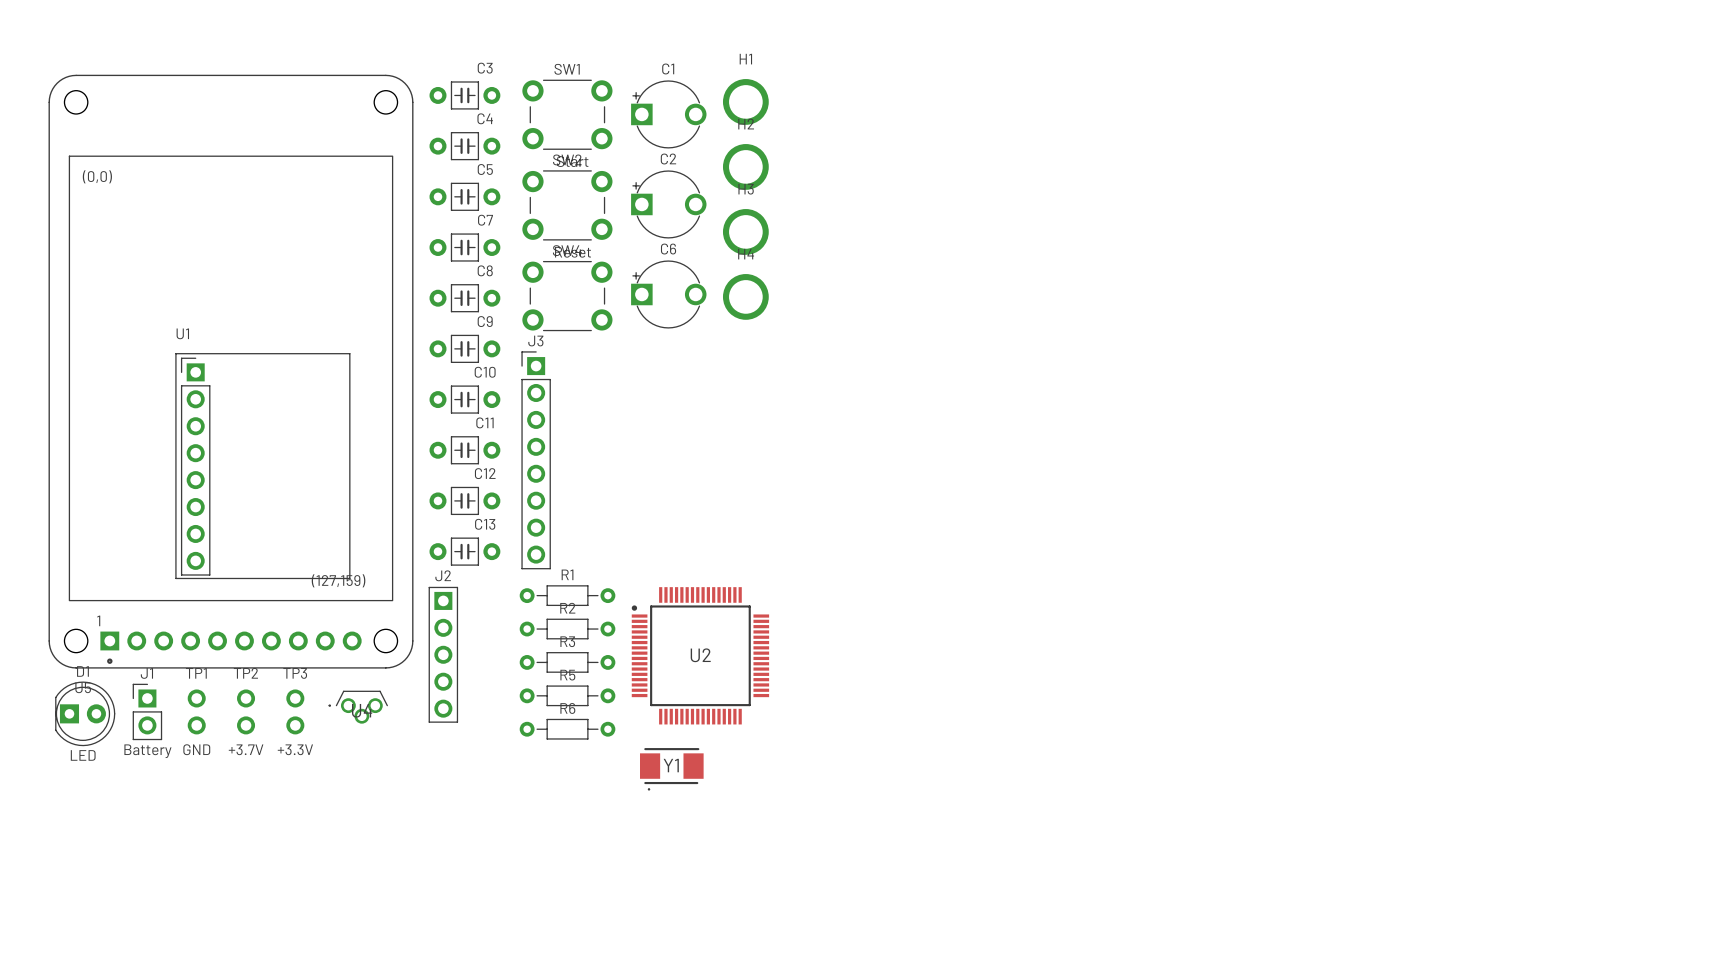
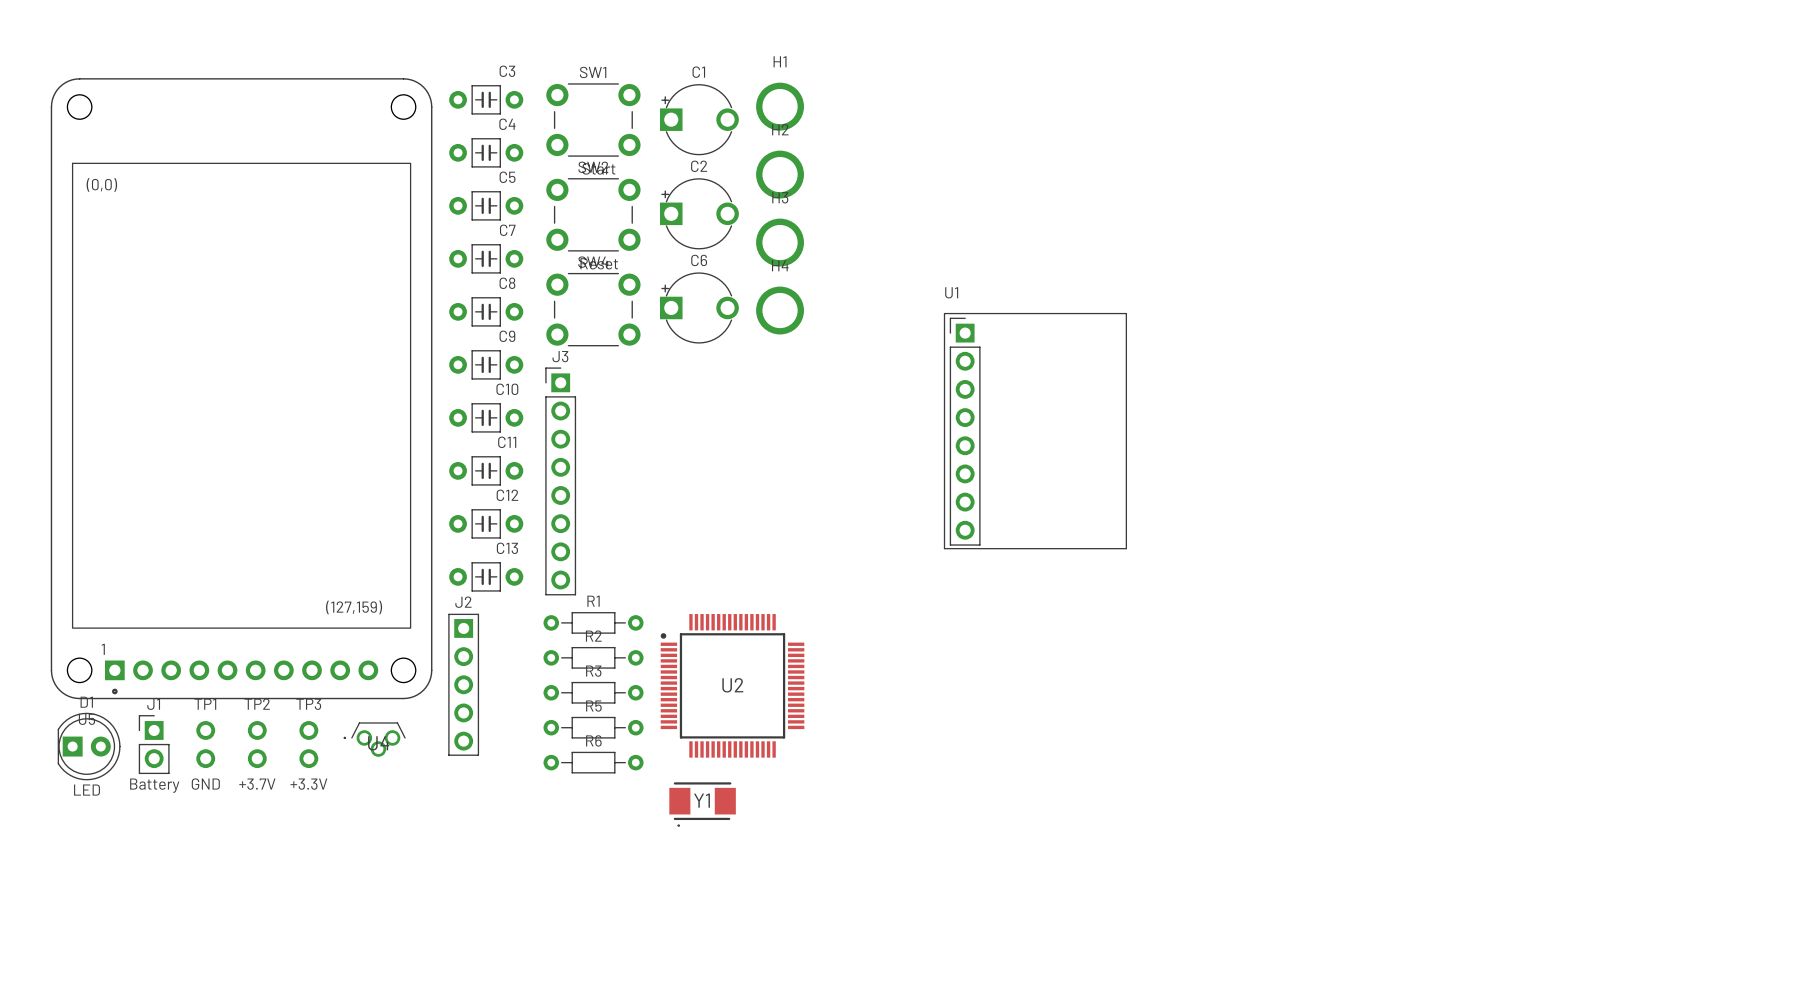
U1 position: (262, 466) -> (1035, 431)

